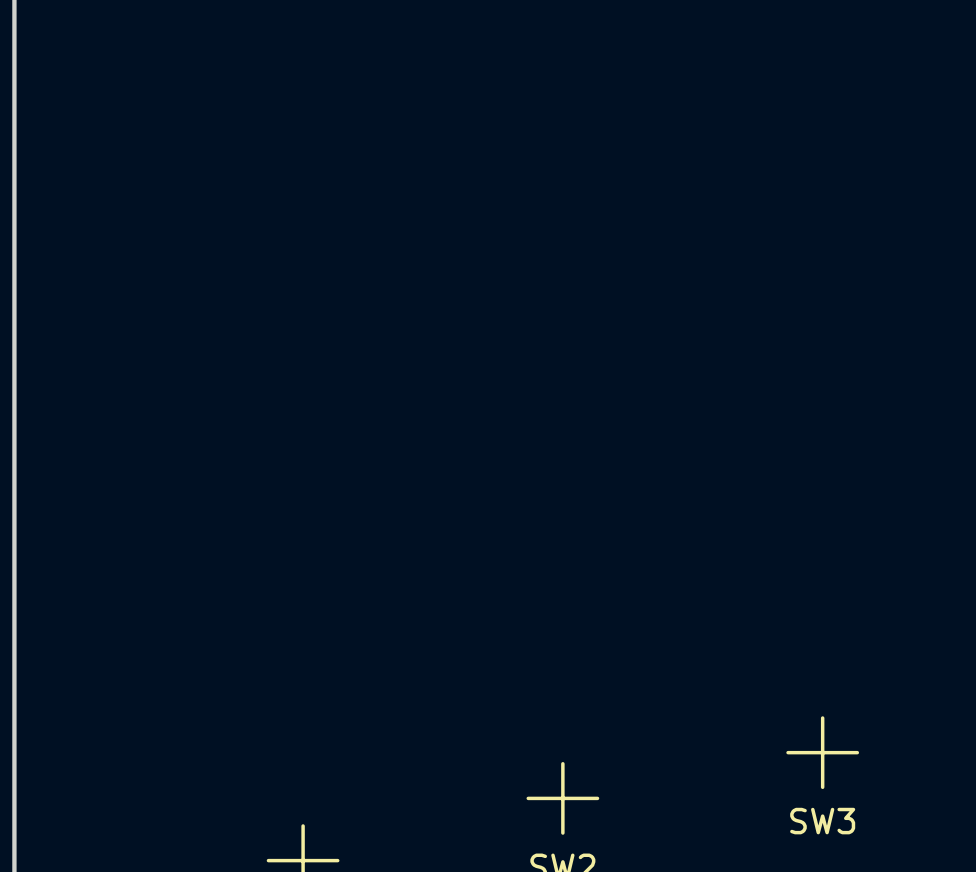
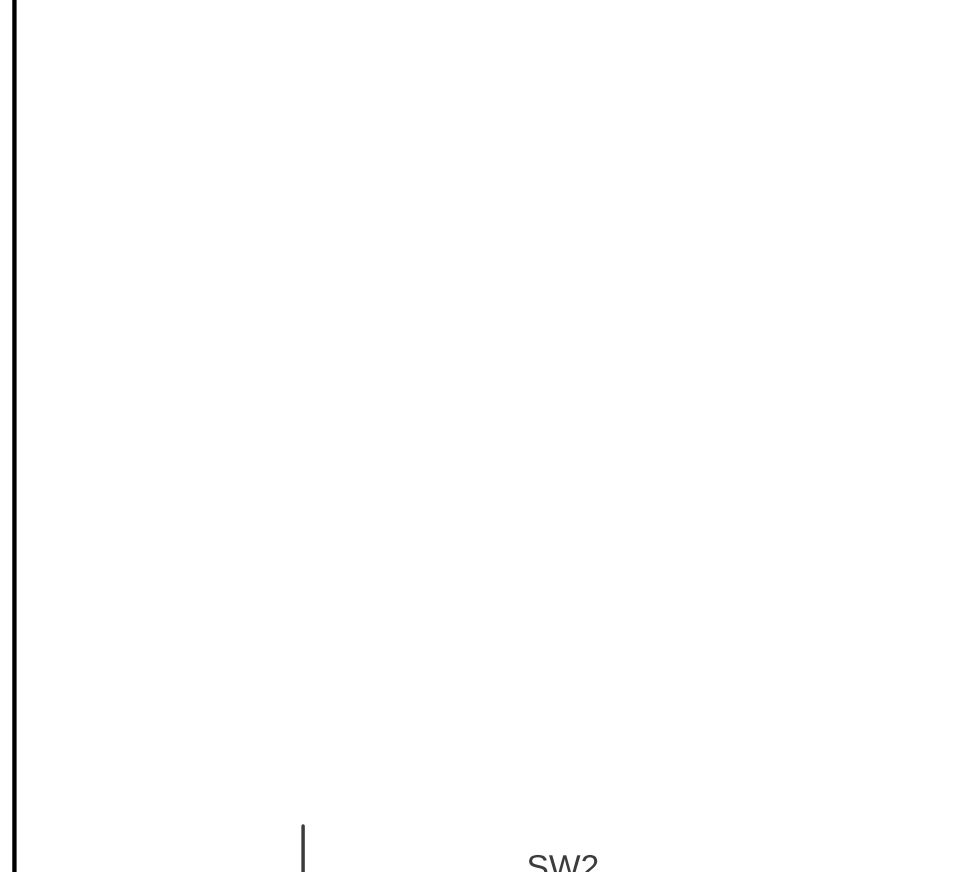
line: (822, 718) (822, 787) -> none
line: (788, 752) (857, 752) -> none
line: (562, 763) (562, 833) -> none
line: (528, 798) (597, 798) -> none
text: SW3 (822, 821) -> none
line: (268, 860) (337, 860) -> none

